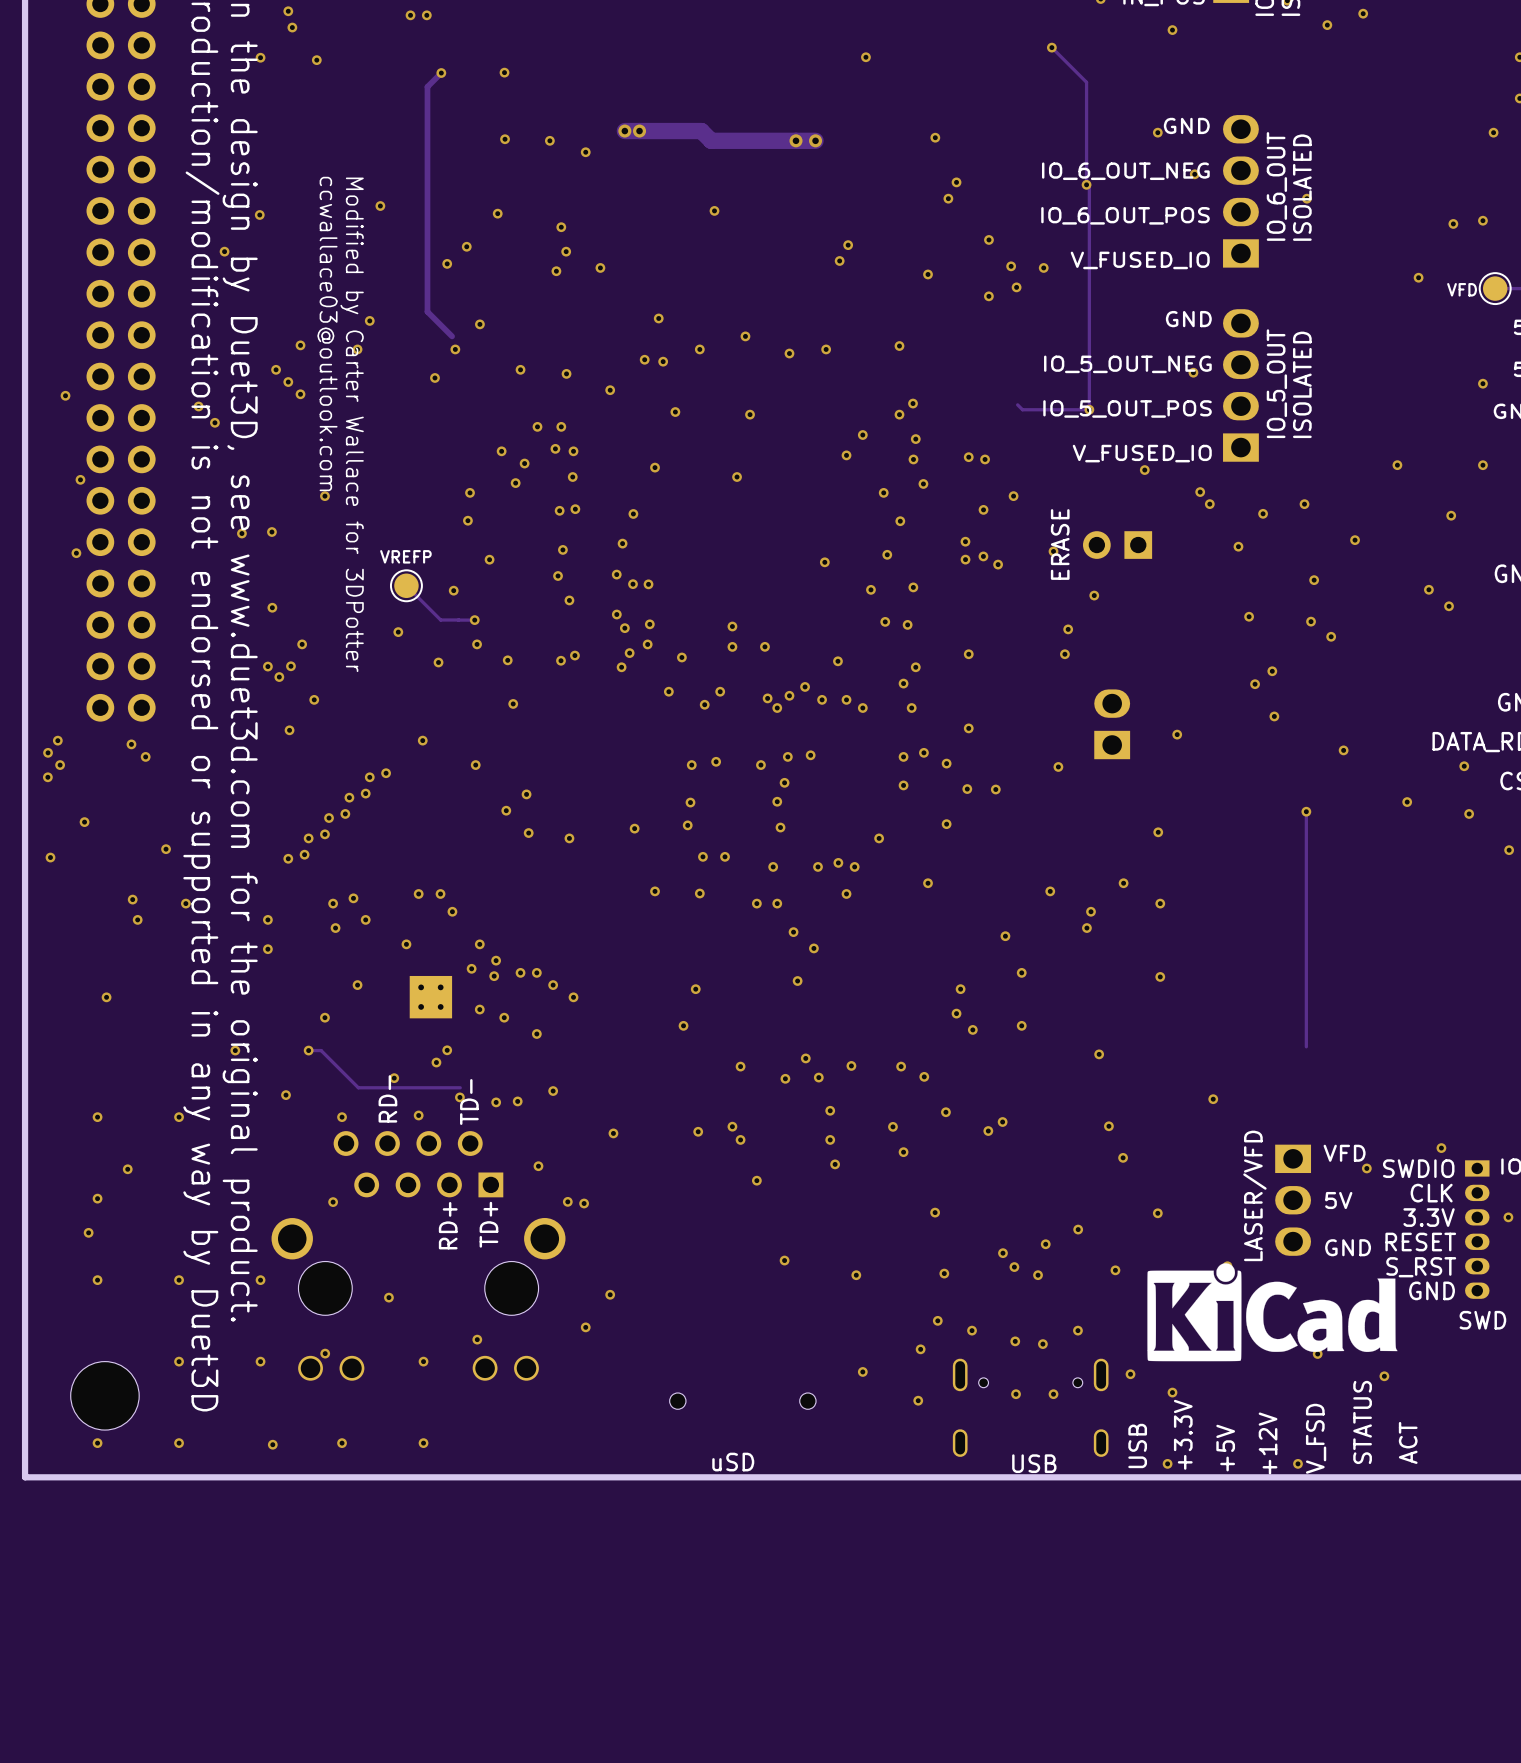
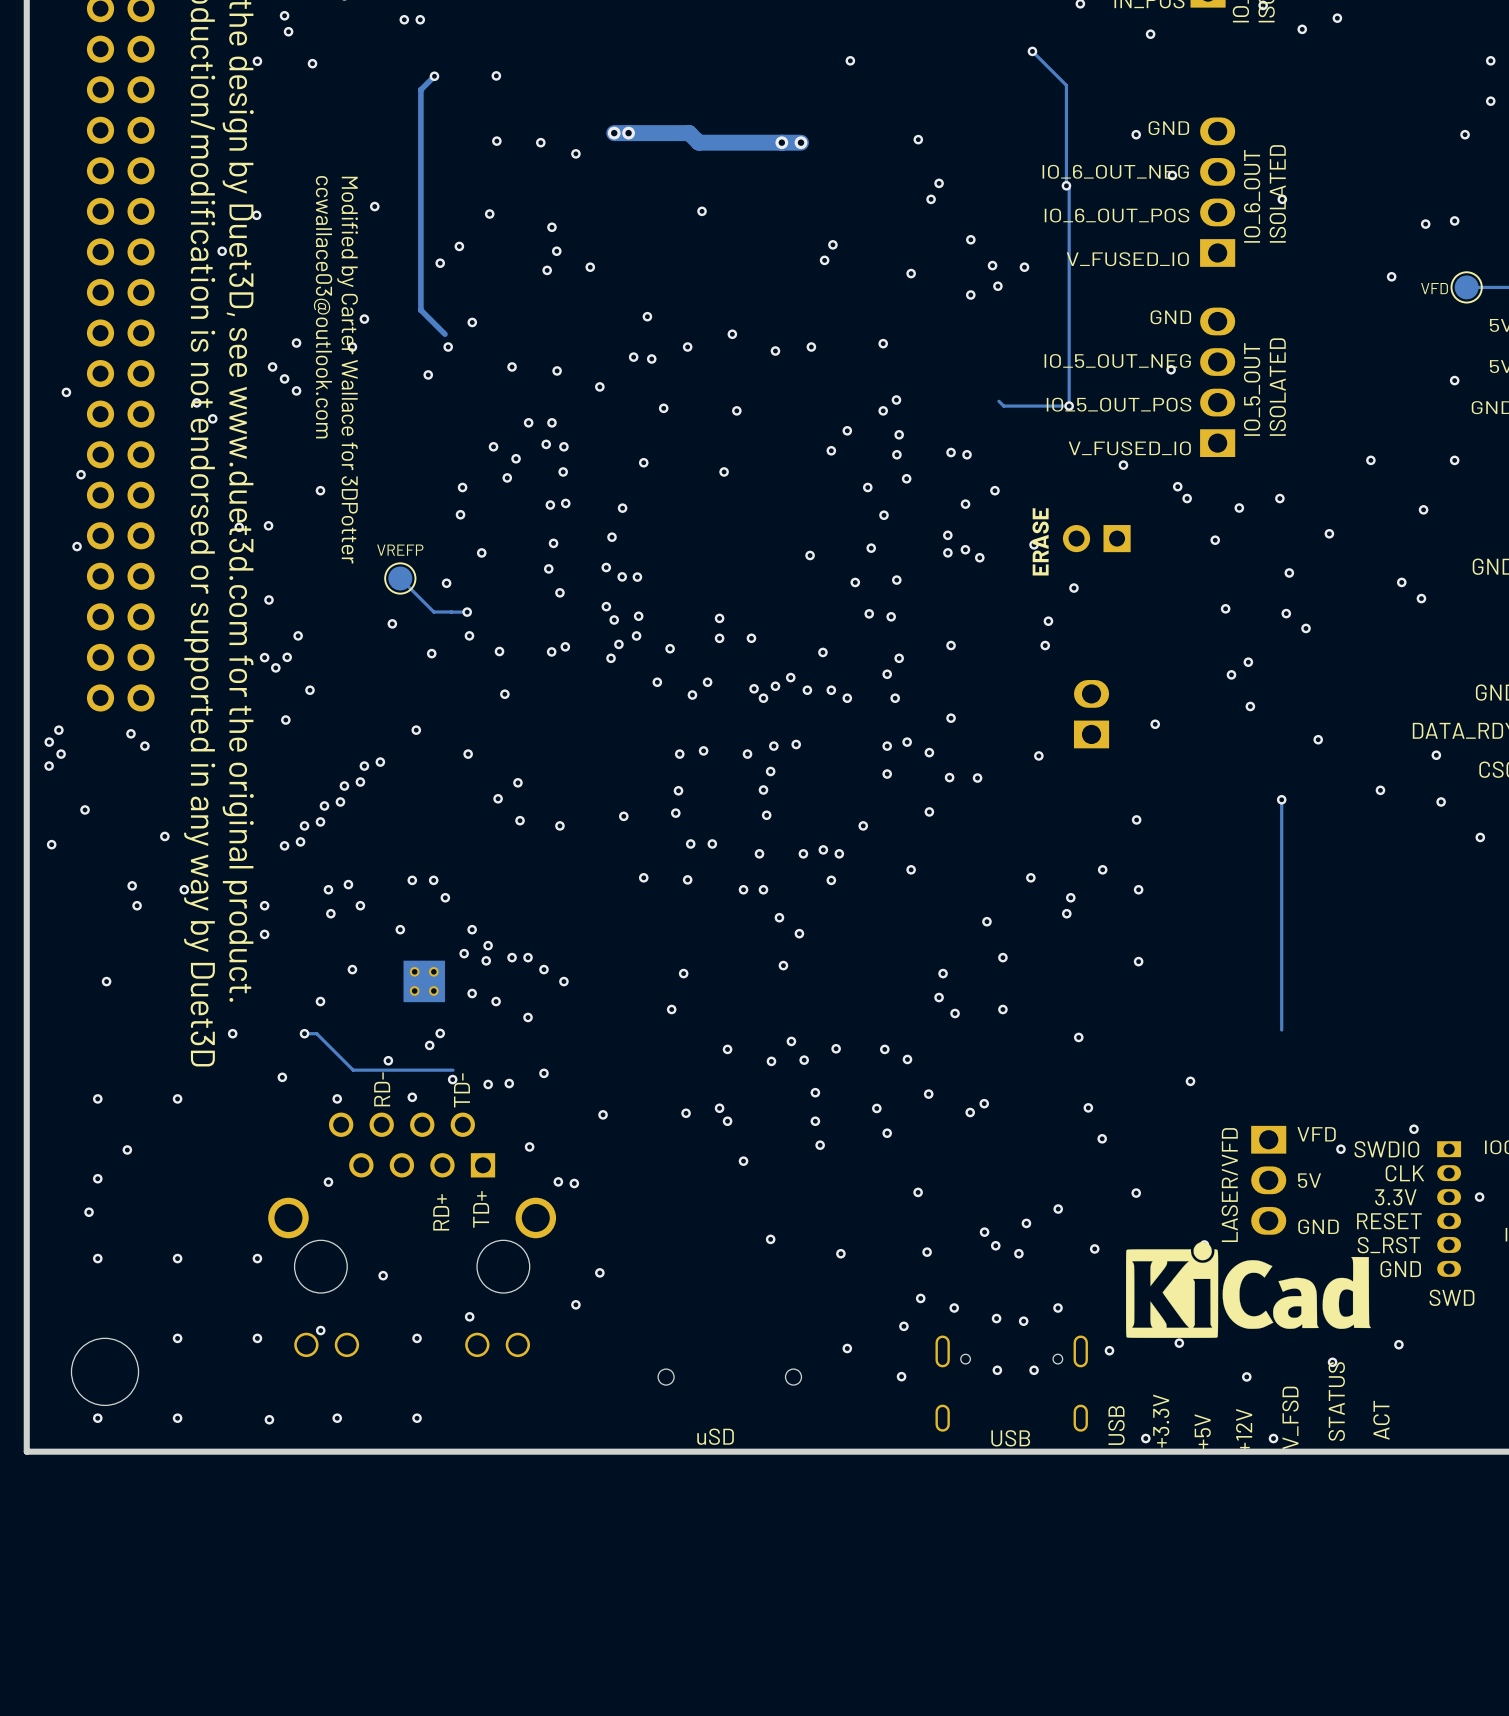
via: (1317, 1353) -> none
via: none -> (1398, 1344)
via: (1384, 1376) -> none
via: none -> (1332, 1362)
via position: (1172, 1392) -> (1179, 1343)
via: none -> (1246, 1376)

